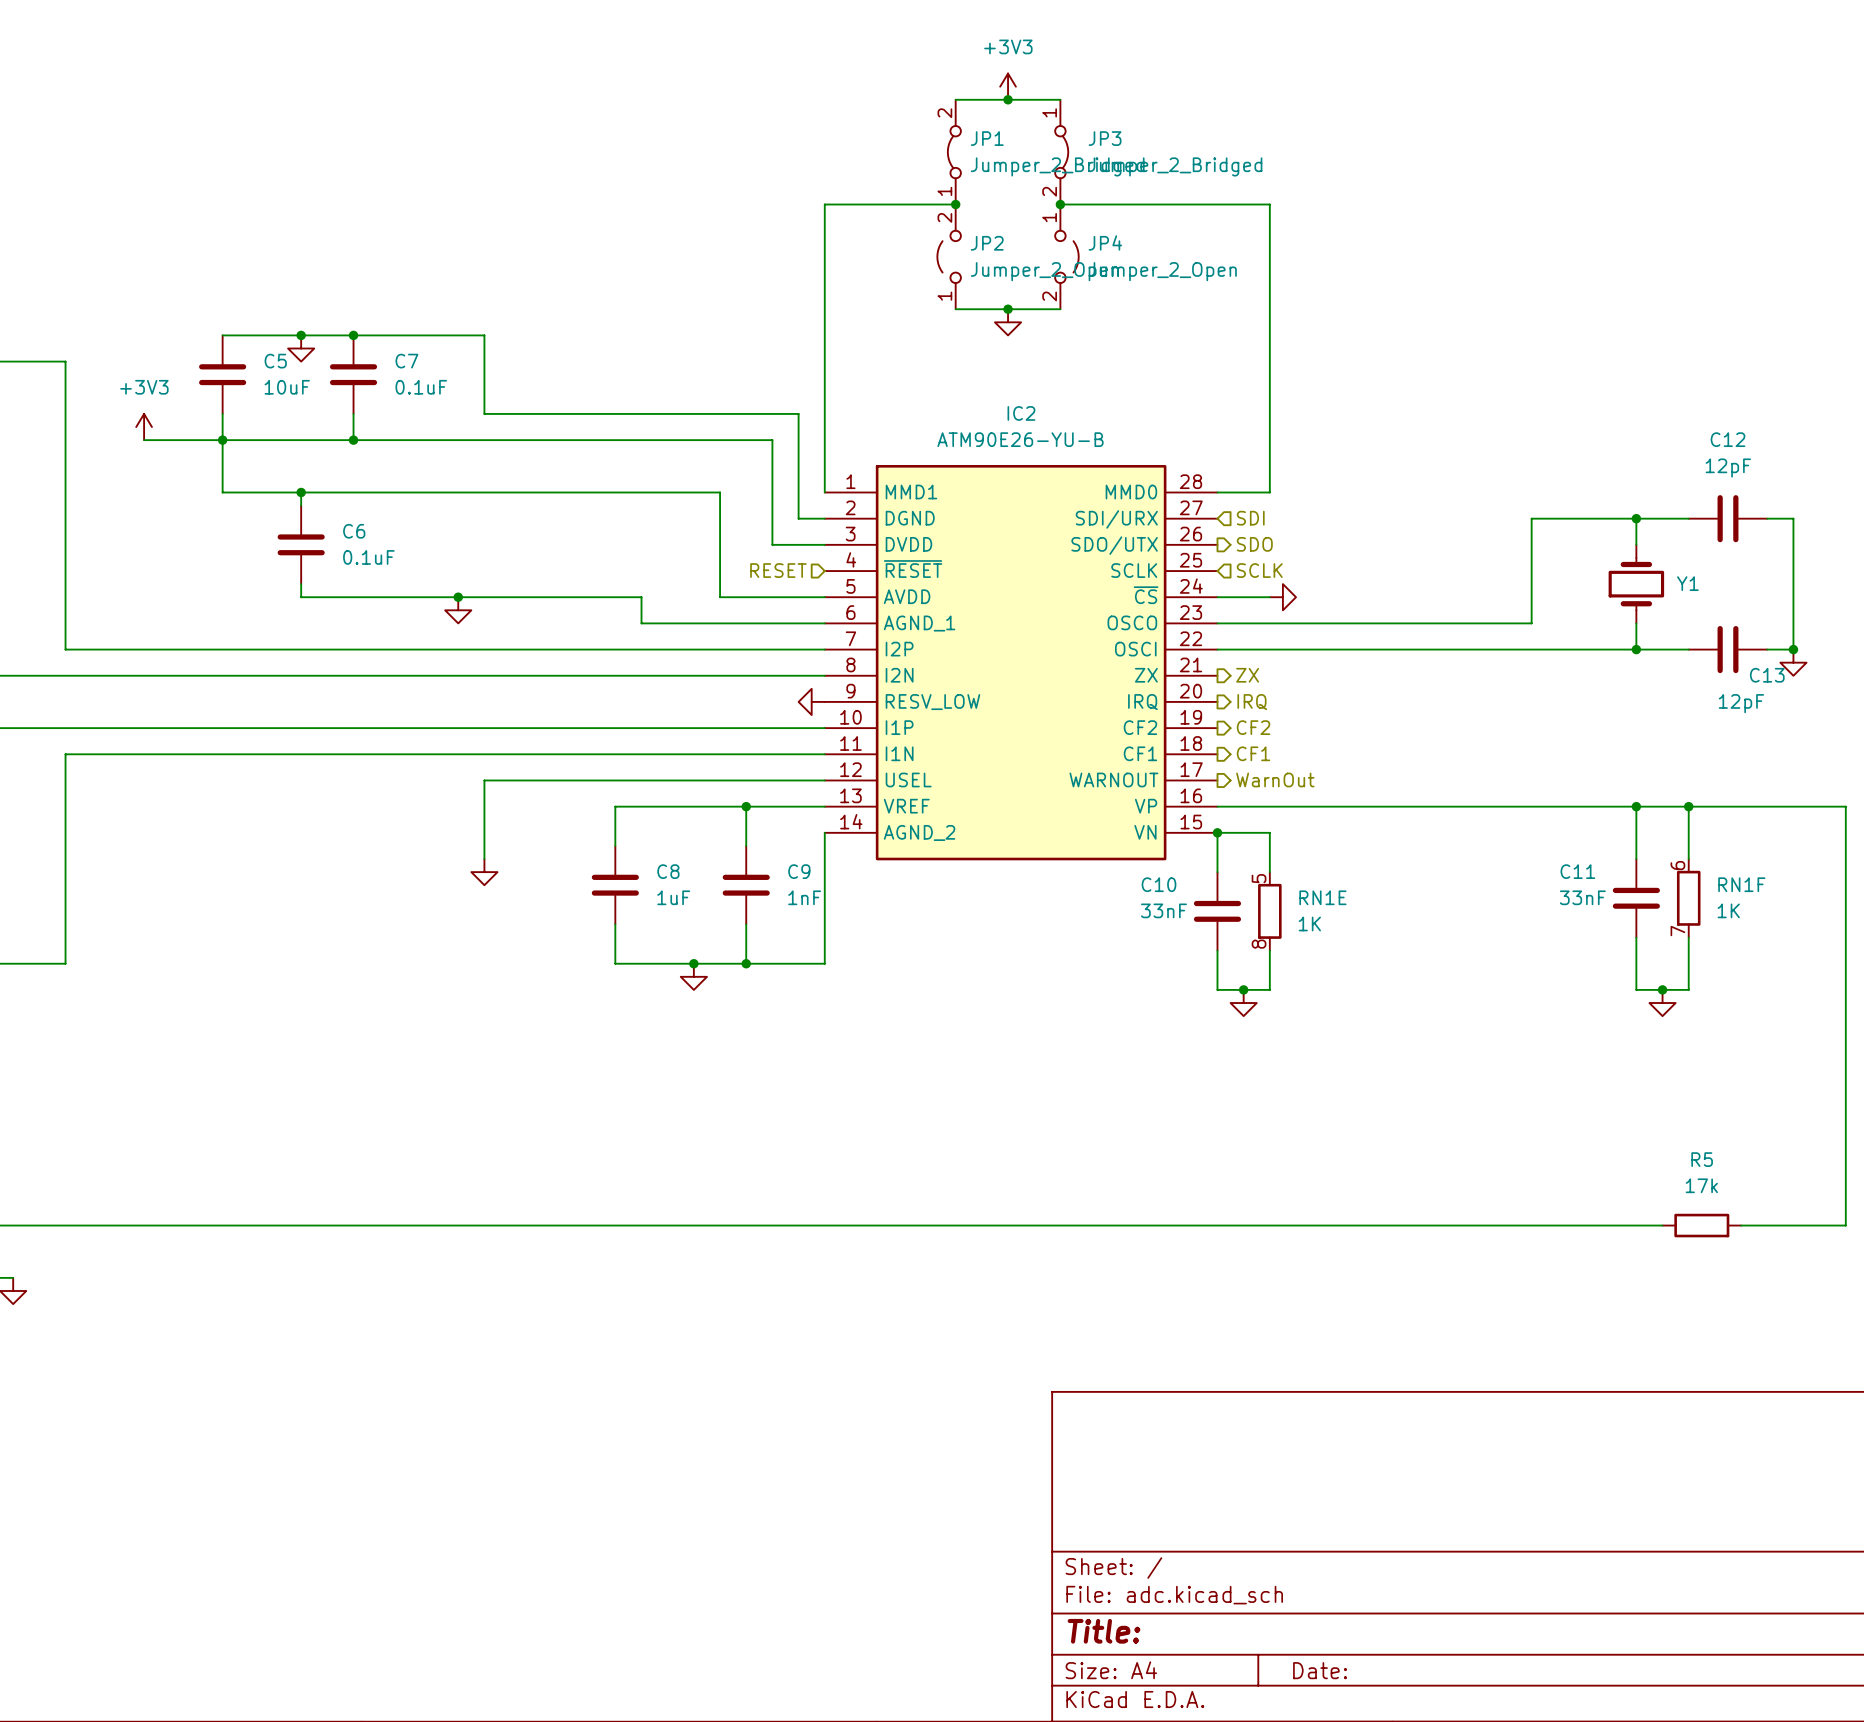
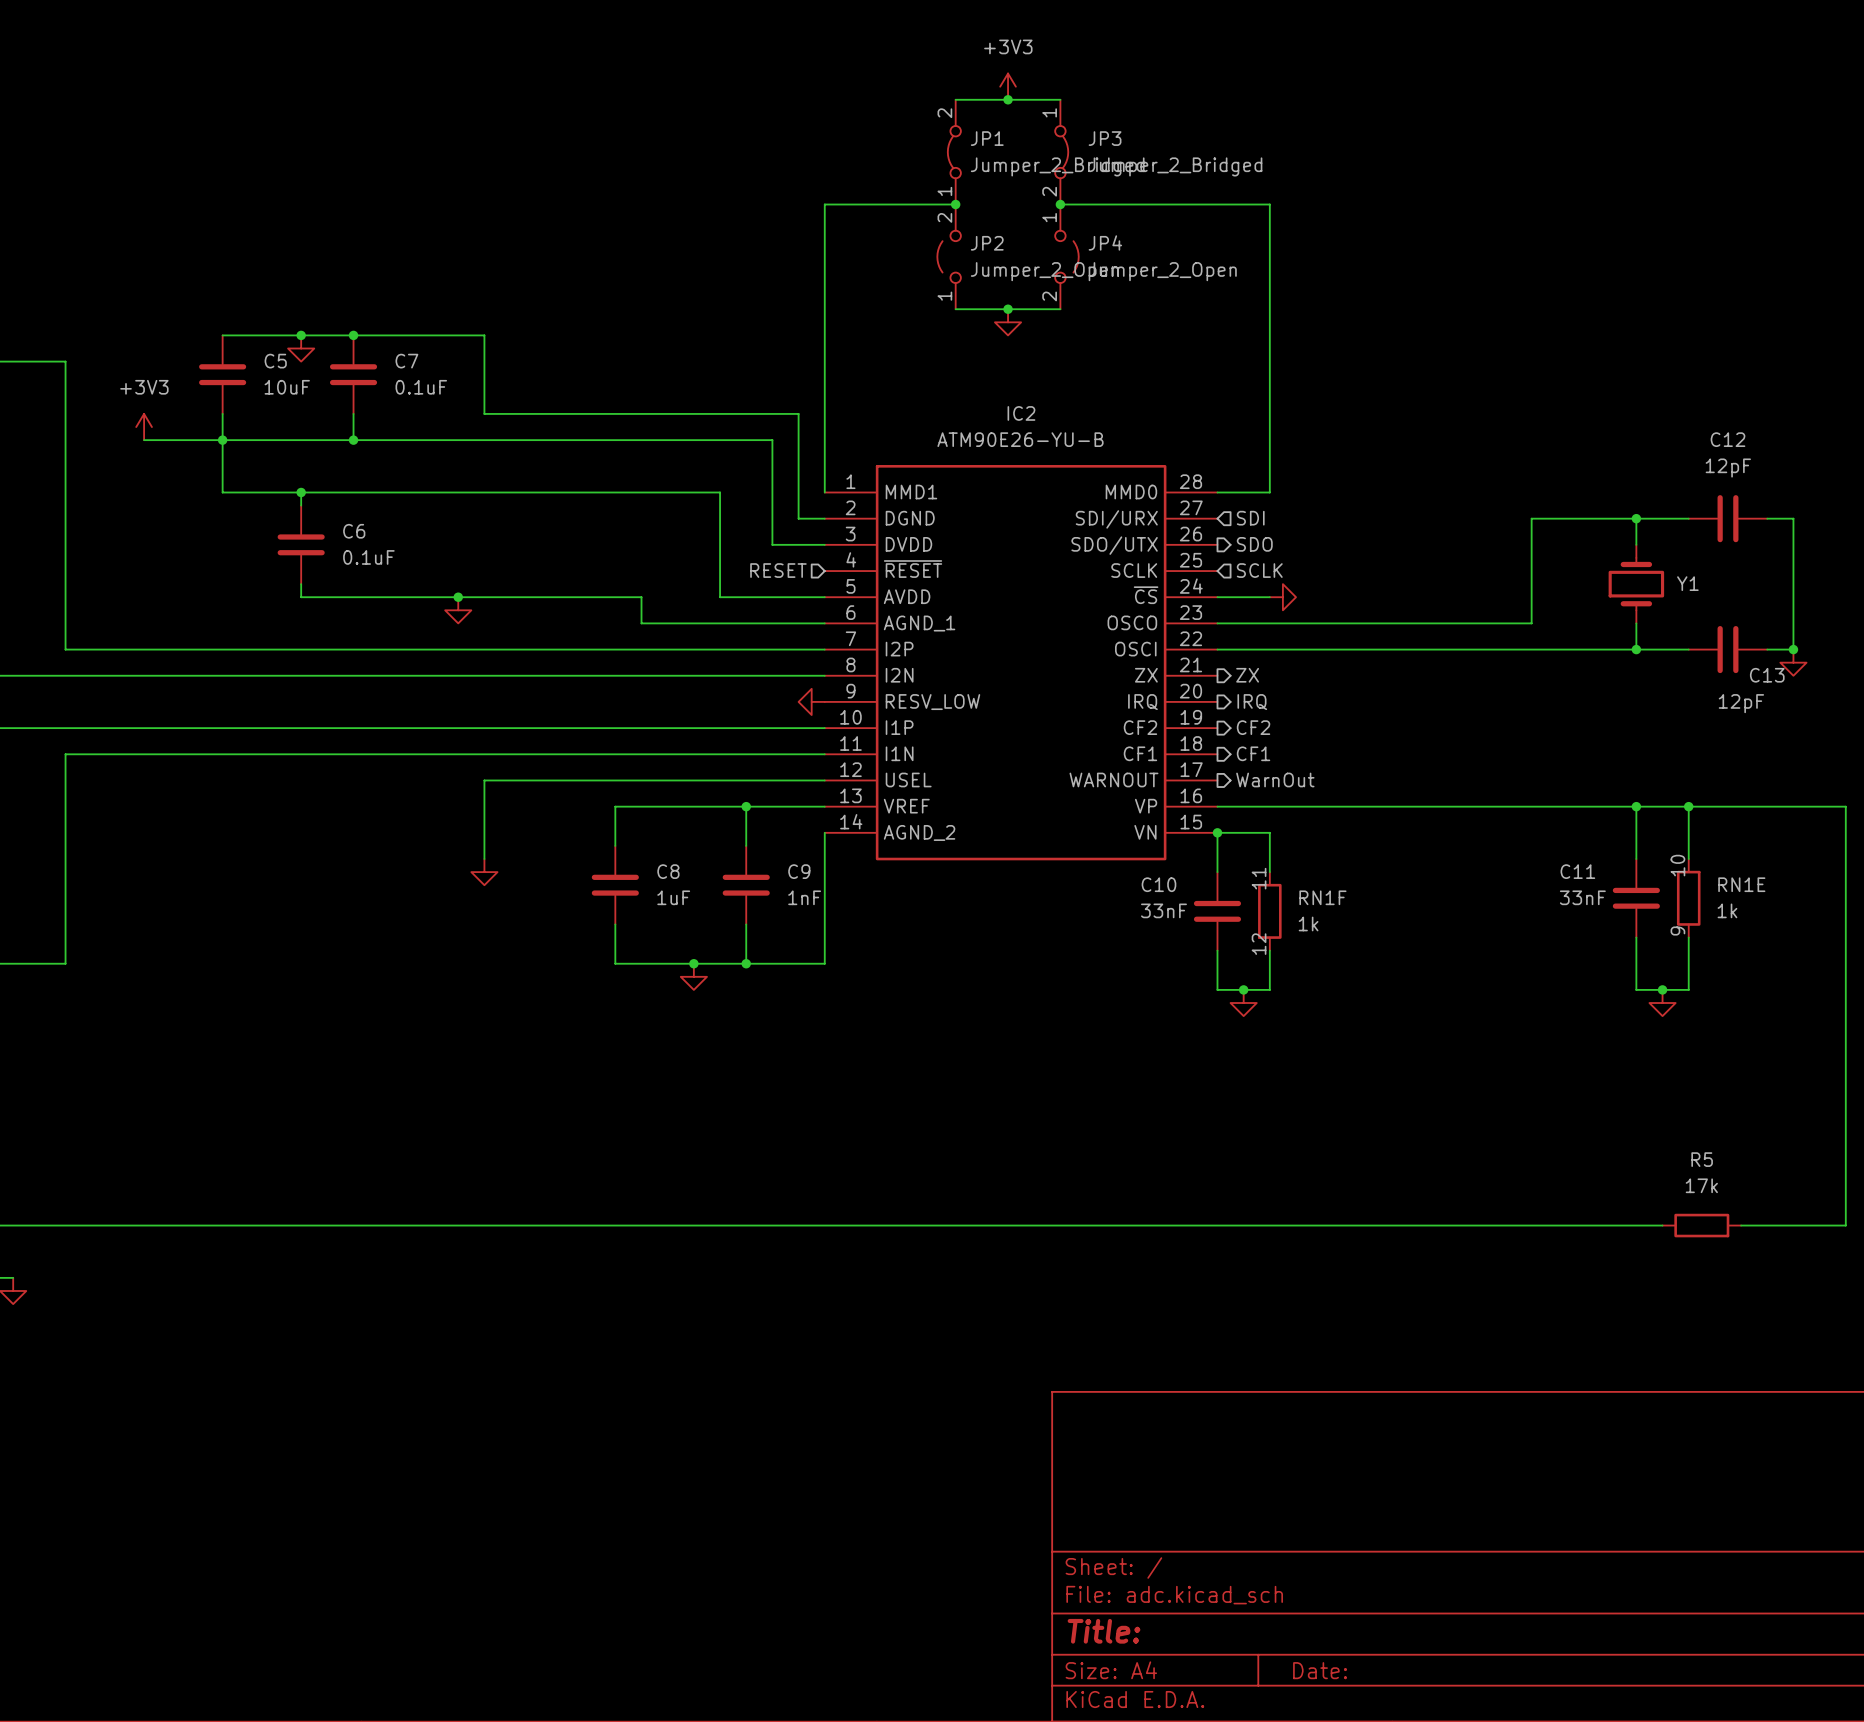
RN1F pin number: 6 (1677, 865) -> 11 (1259, 878)
RN1E pin number: 5 (1259, 878) -> 10 (1677, 865)
RN1F position: (1688, 898) -> (1269, 911)
RN1F value: 1K (1728, 910) -> 1k (1308, 923)
RN1E position: (1269, 911) -> (1688, 898)
RN1E value: 1K (1309, 923) -> 1k (1727, 910)
RN1F pin number: 7 (1677, 931) -> 12 (1259, 944)
RN1E pin number: 8 (1259, 944) -> 9 (1677, 931)

